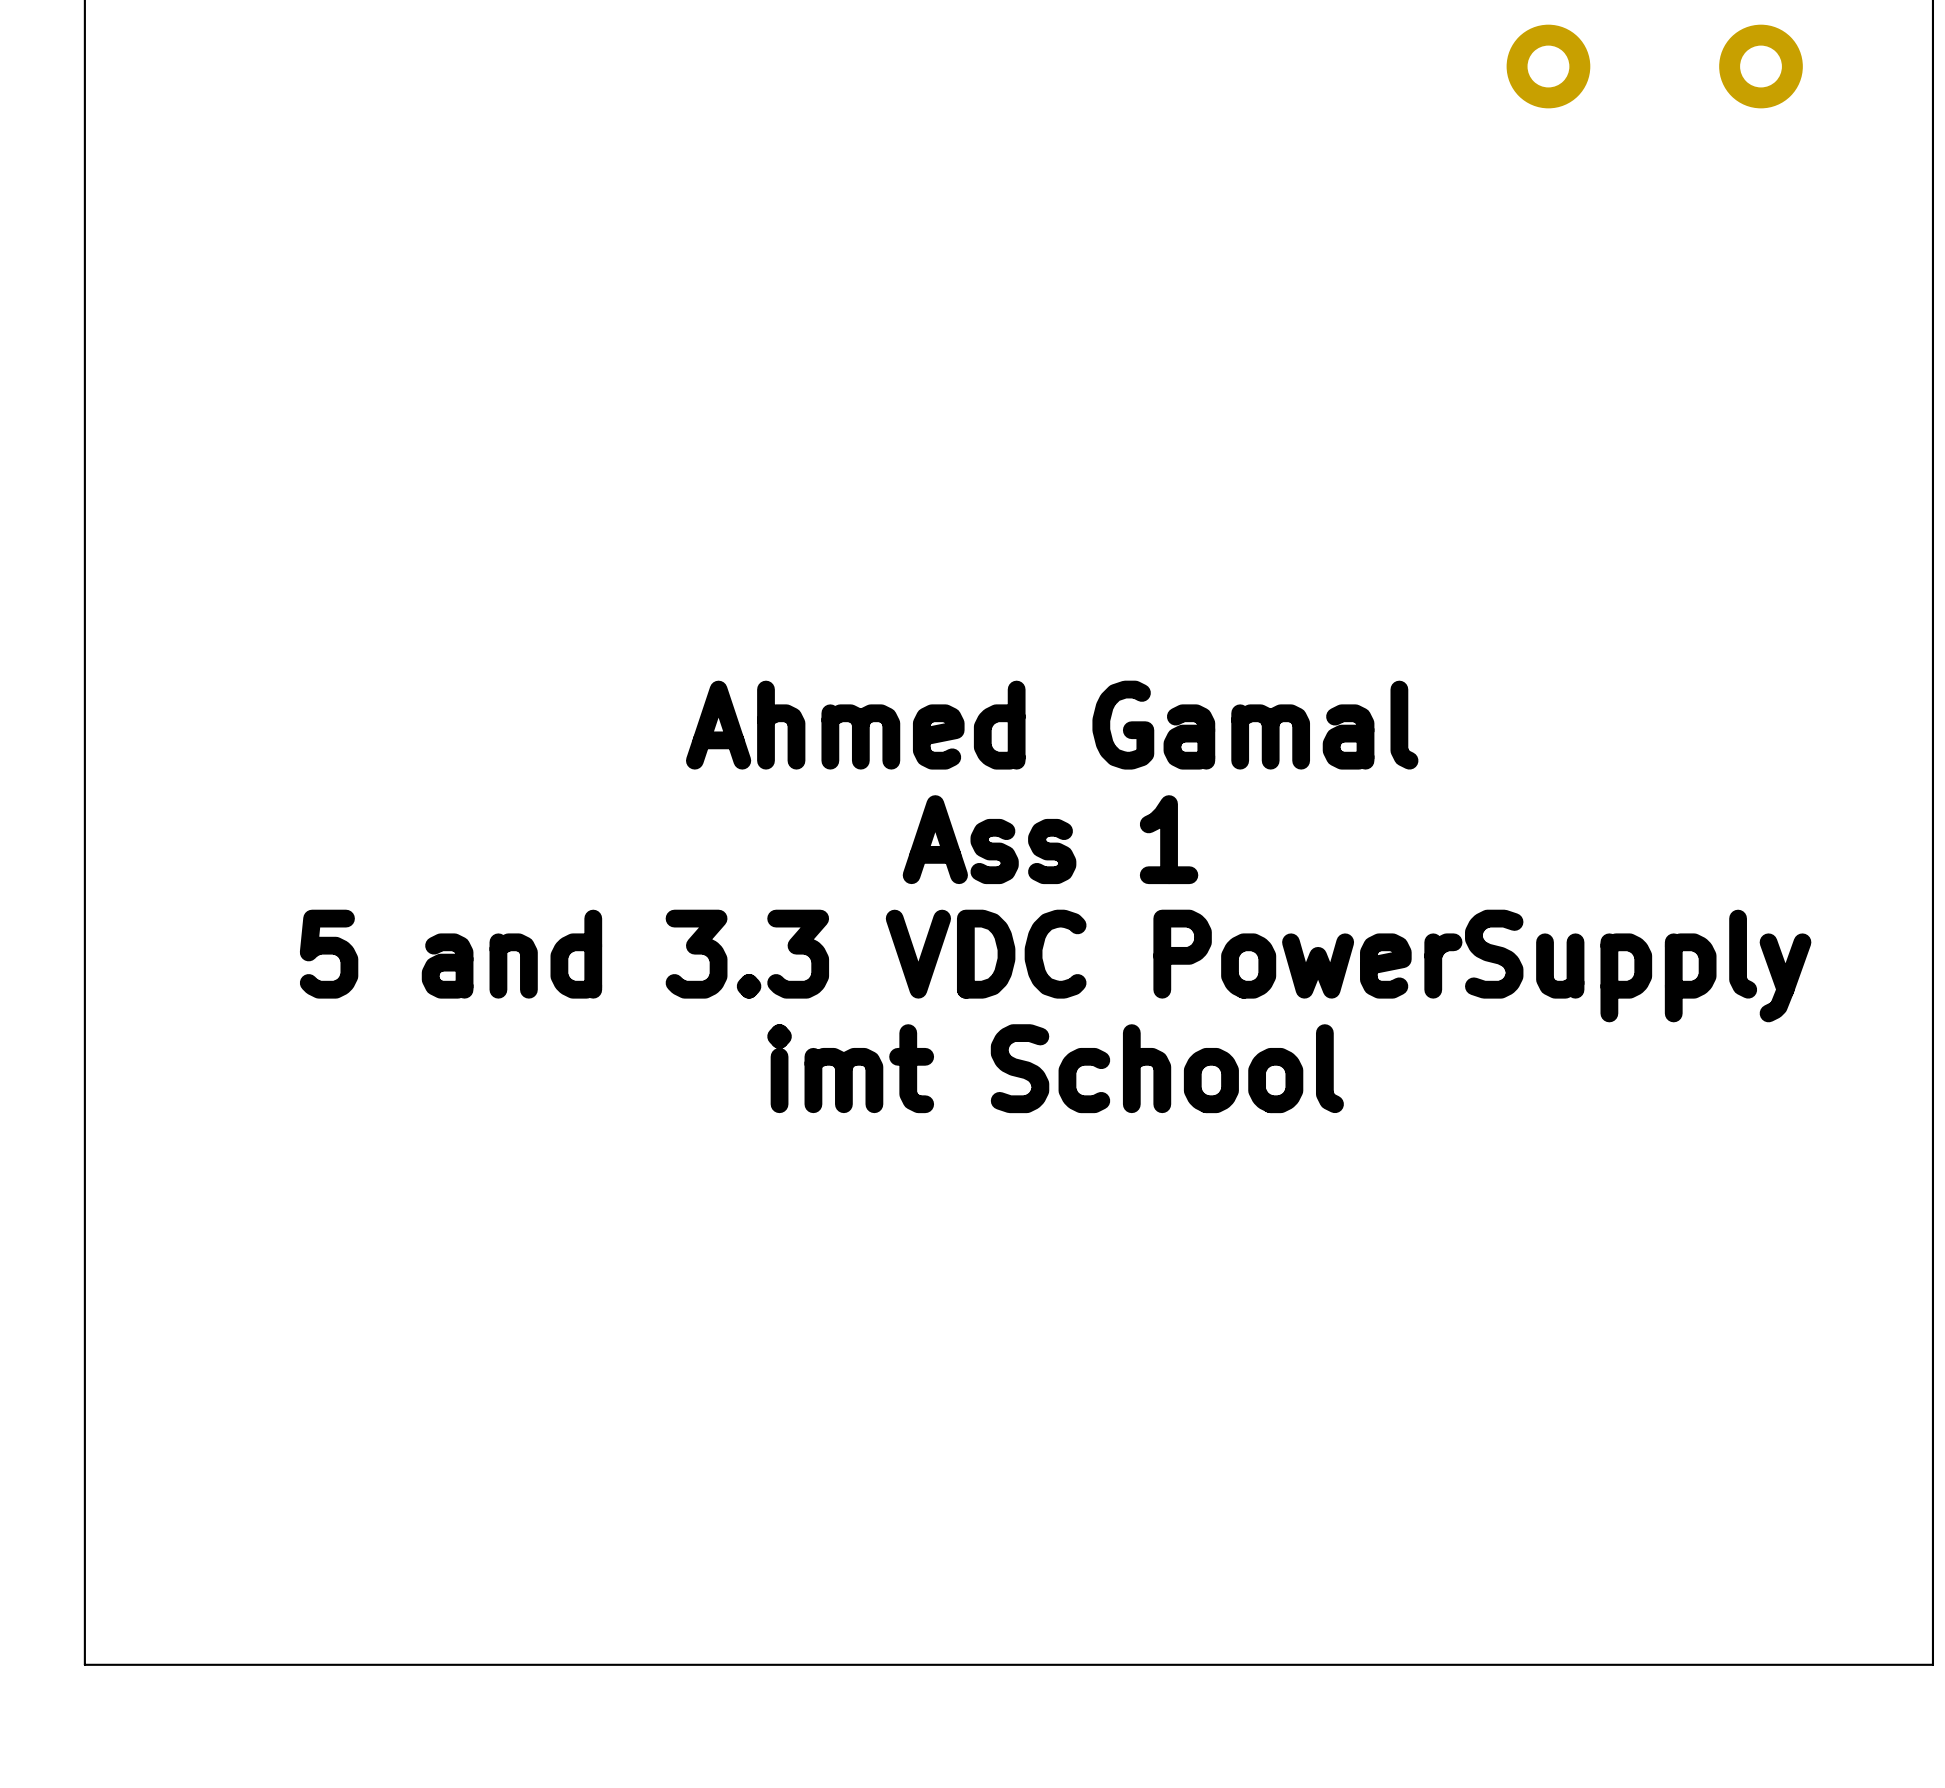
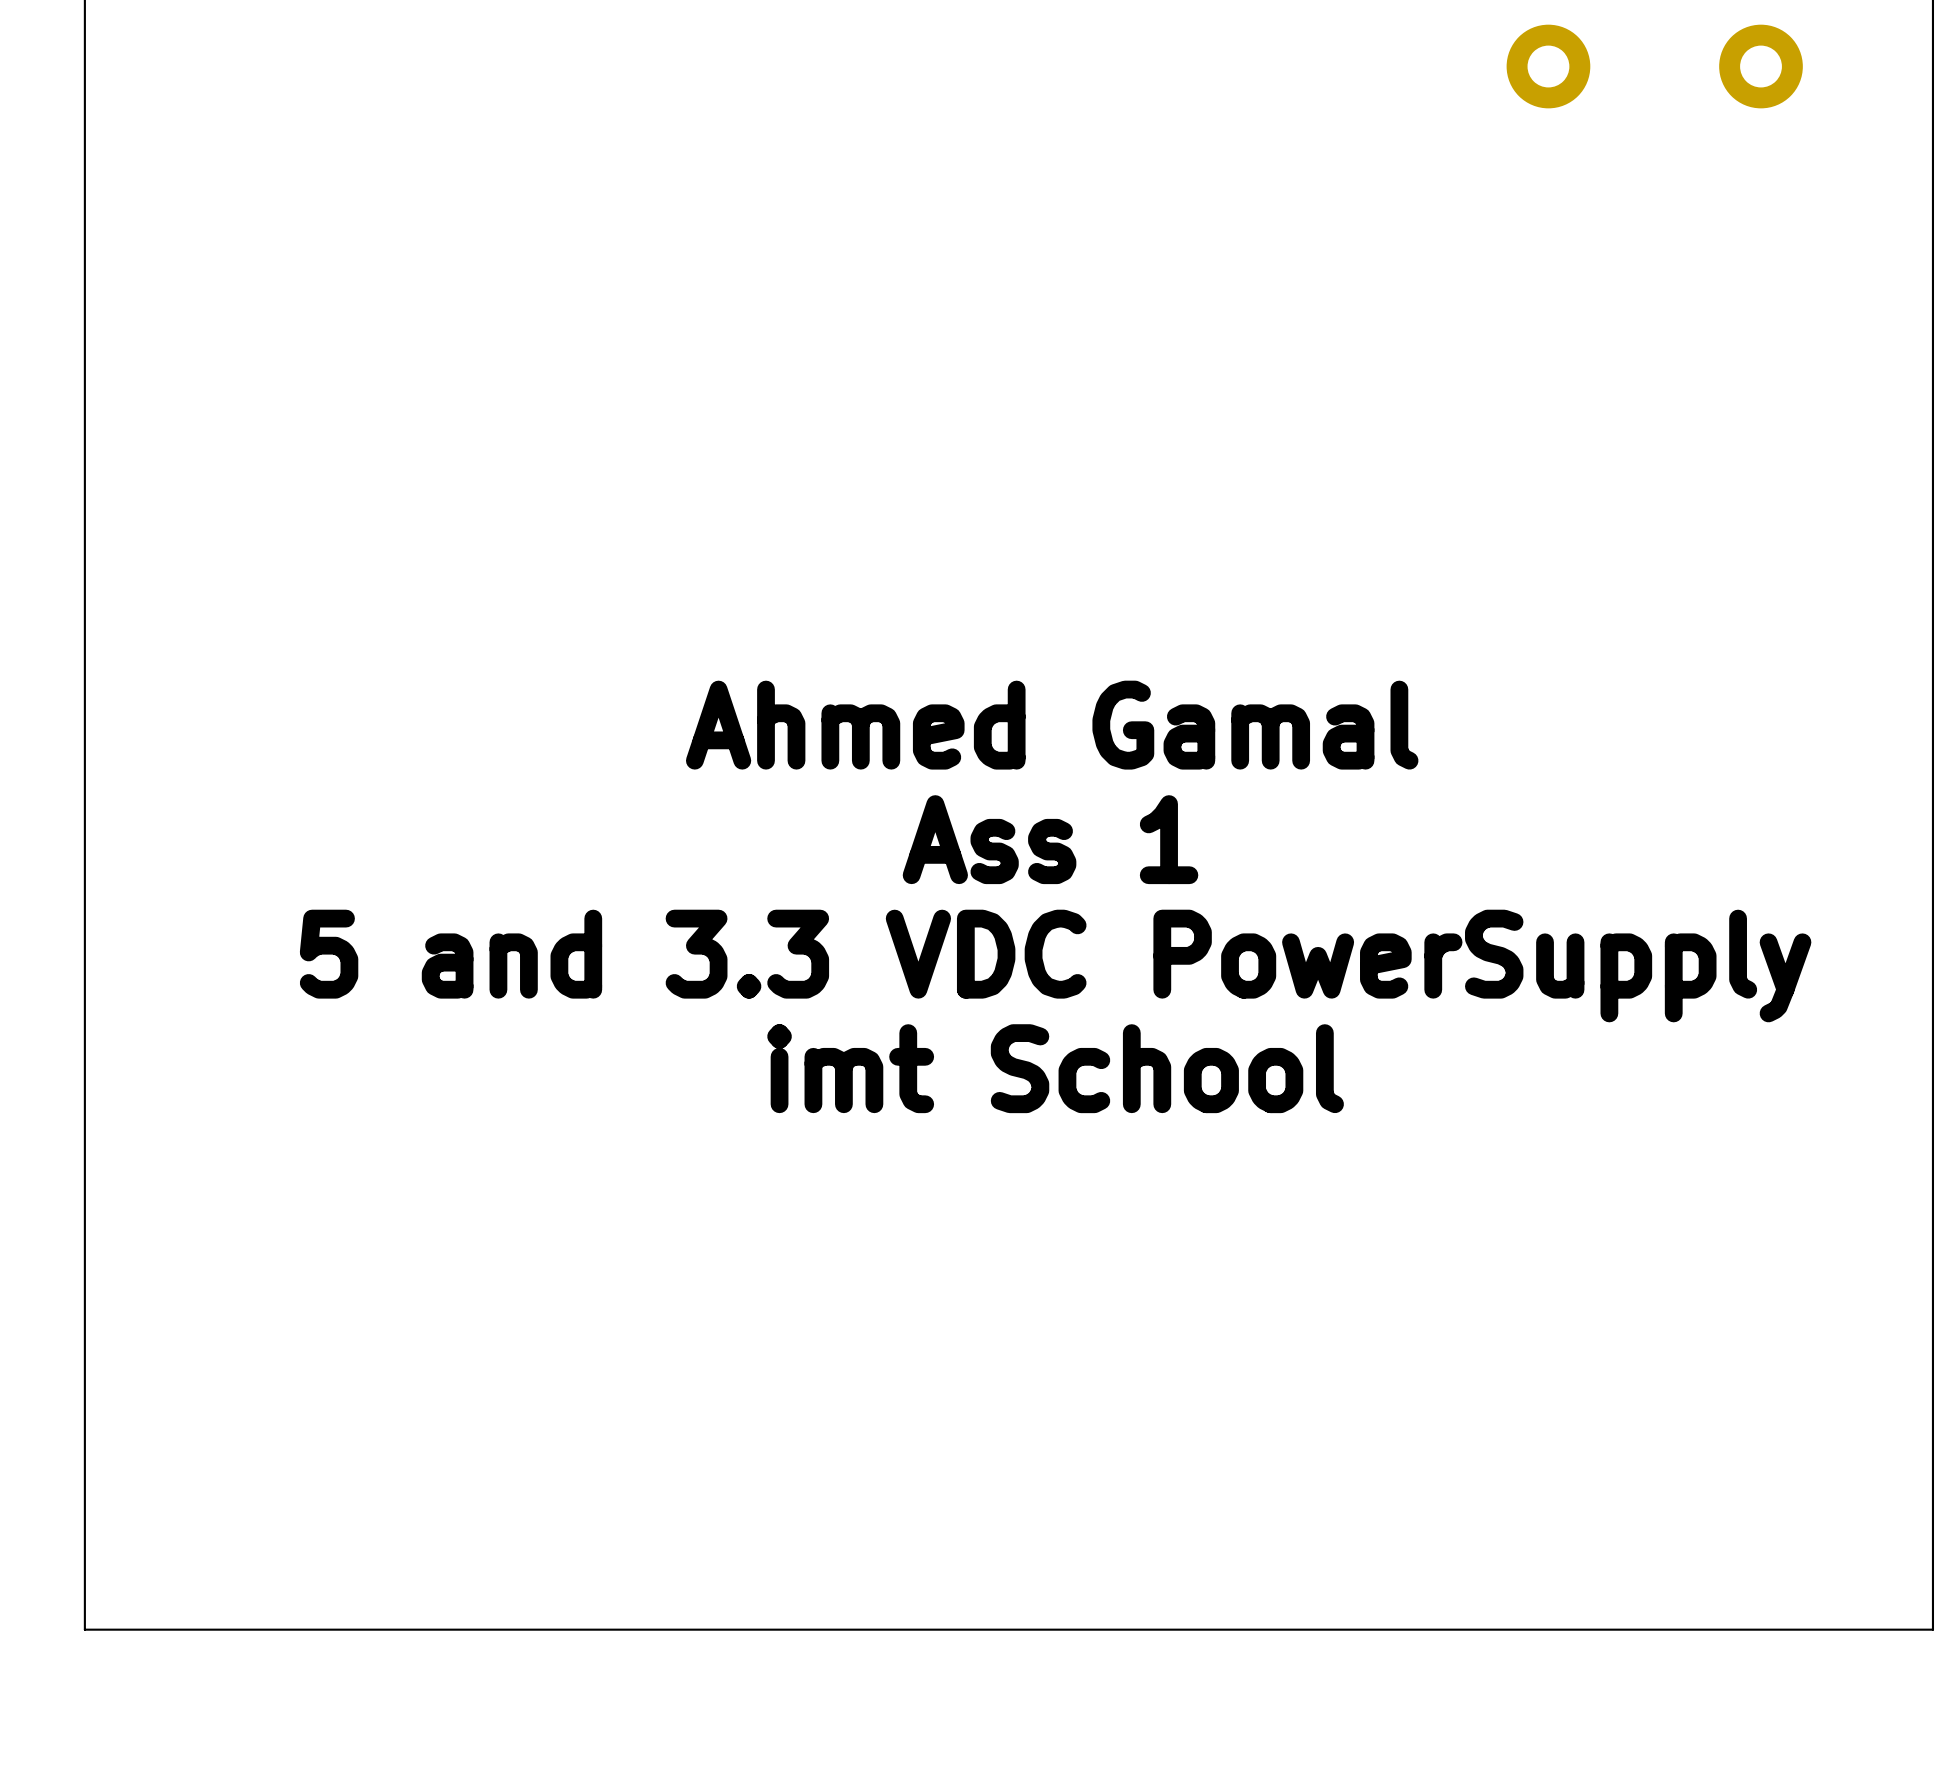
board edge: (1932, 1629) (1932, 1664) (84, 1664) (84, 1629) -> (1932, 1629) (84, 1629)

